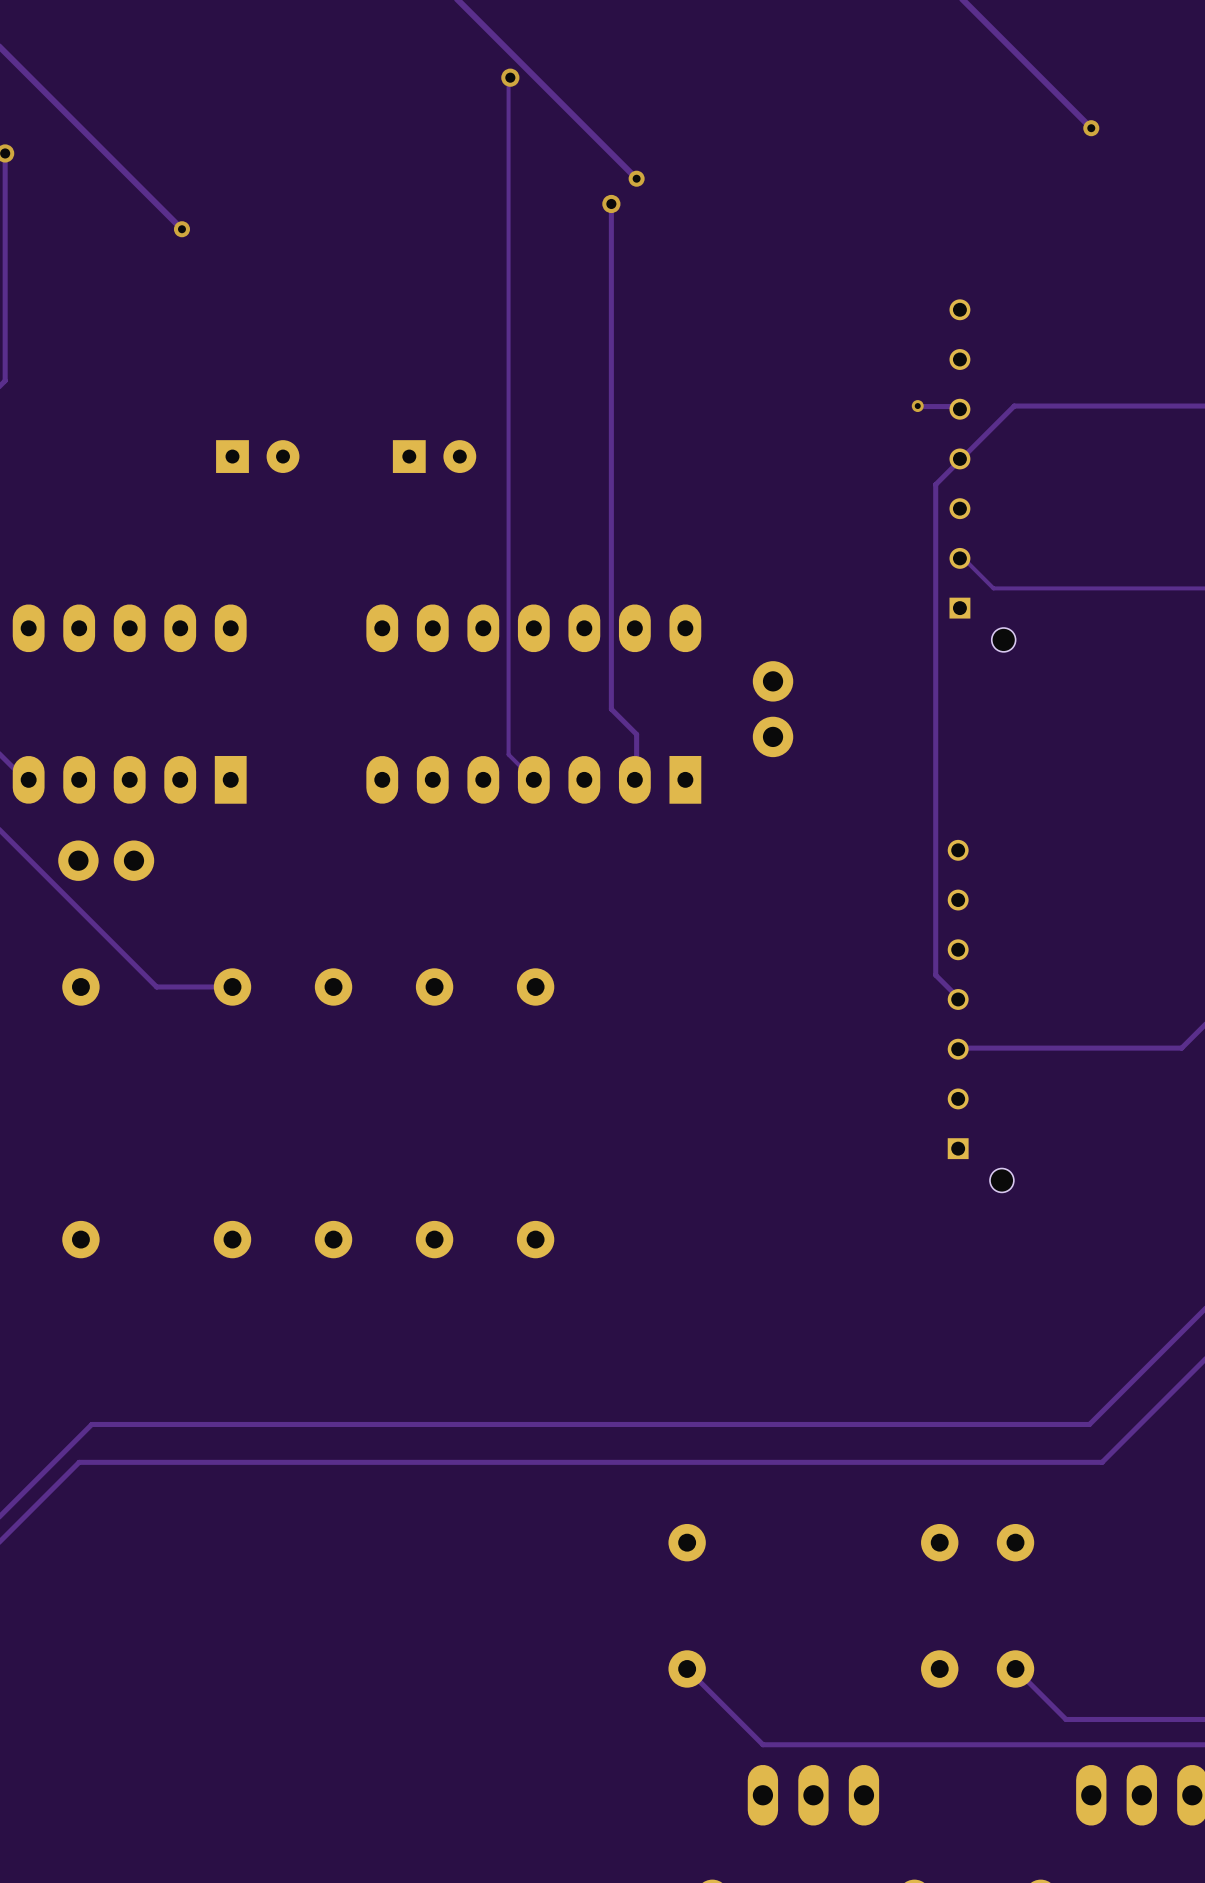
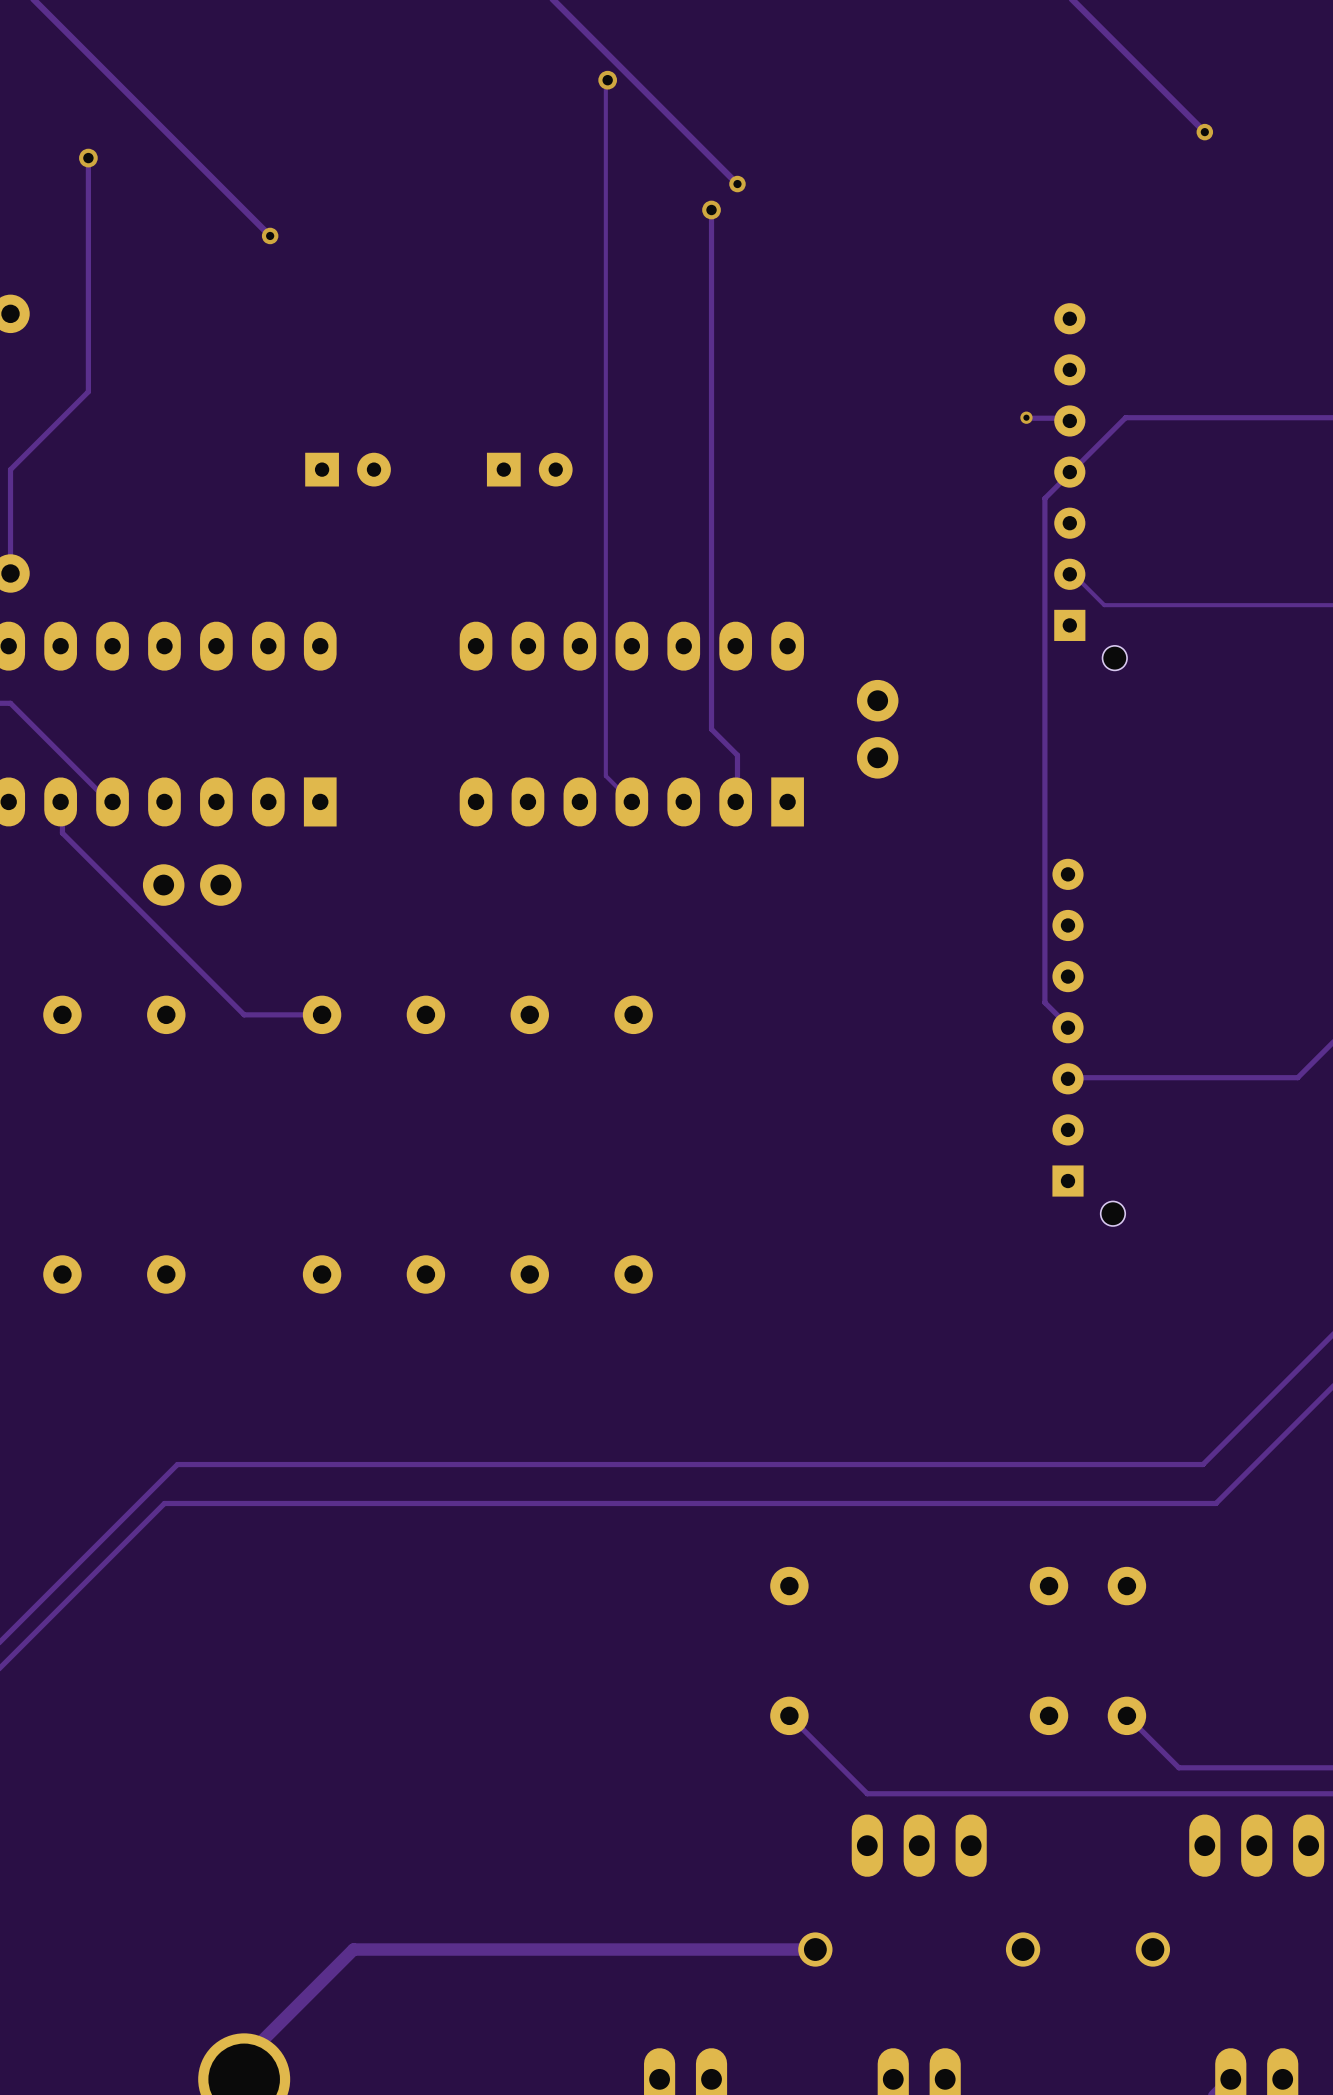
part footprint: [949, 299, 1016, 652] -> [1054, 303, 1128, 671]
part footprint: [947, 839, 1014, 1193] -> [1052, 858, 1126, 1226]

